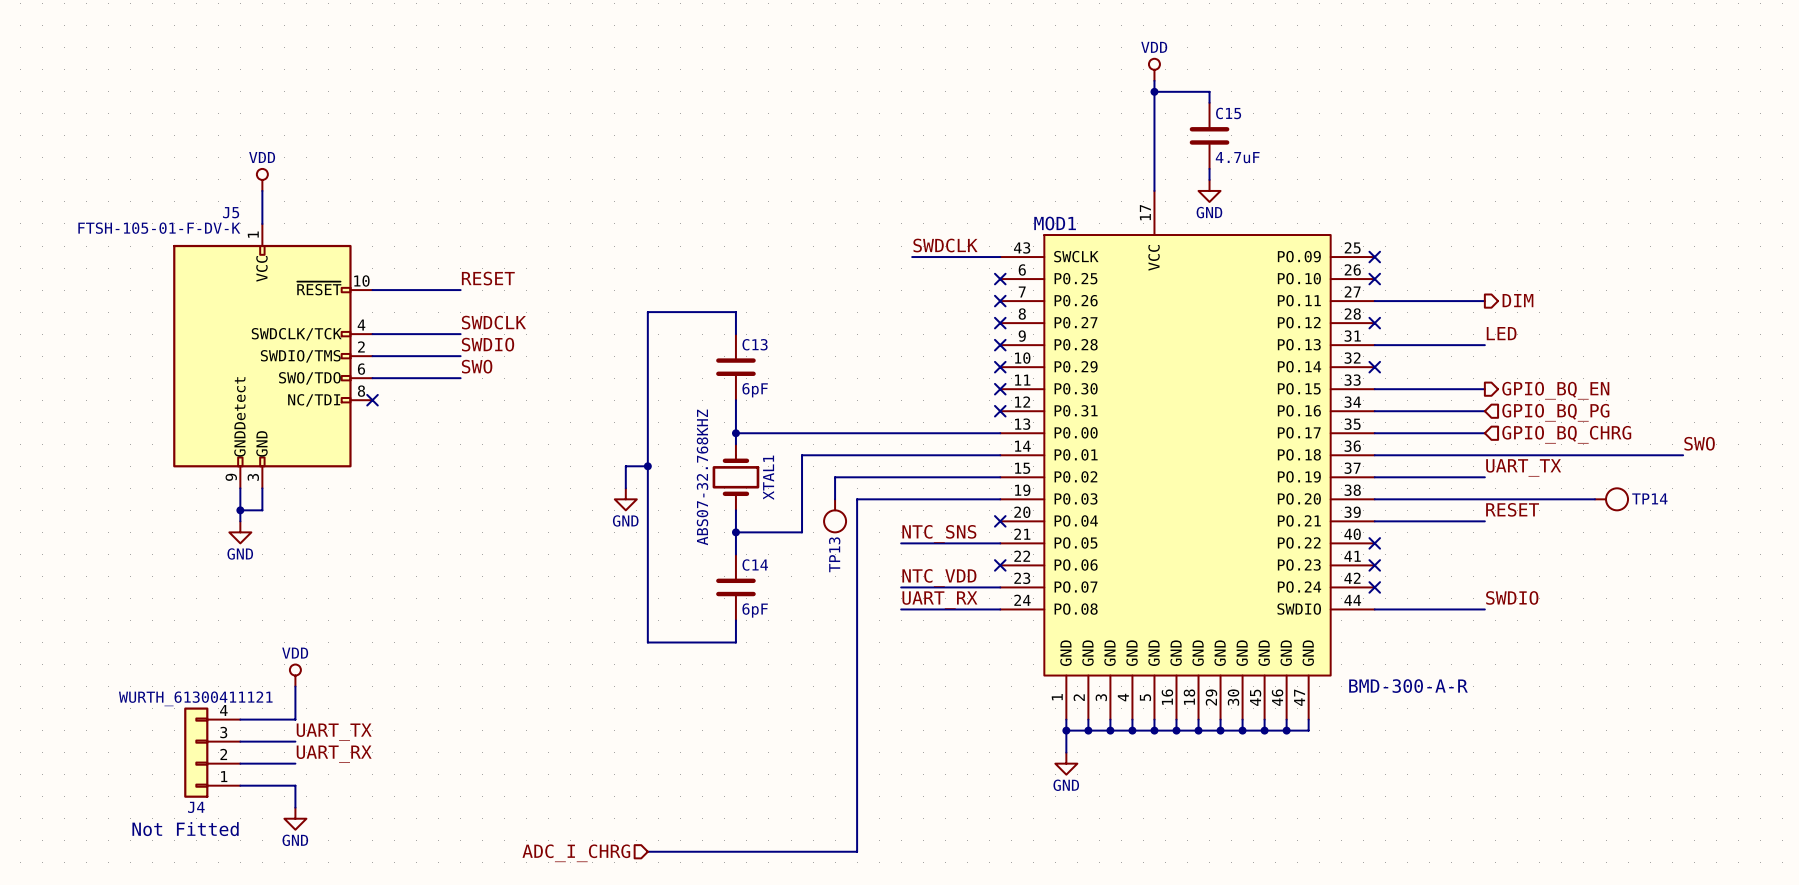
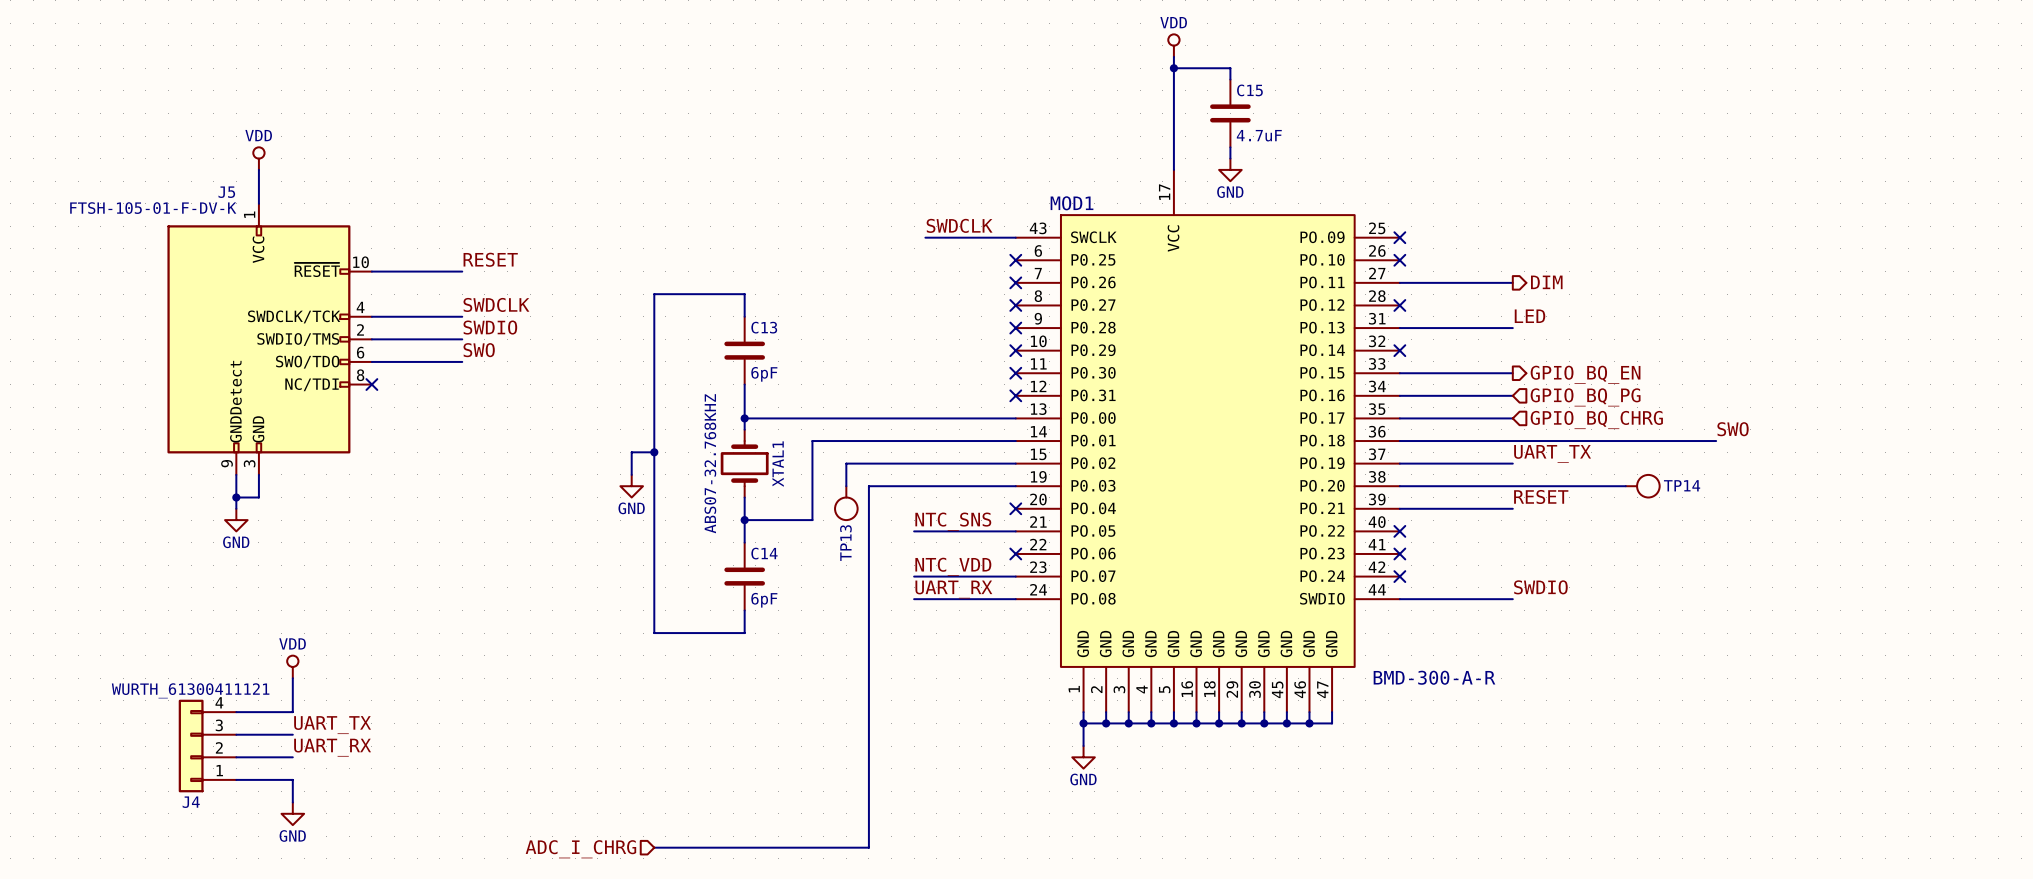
J4 text: Not Fitted (185, 829) -> none

